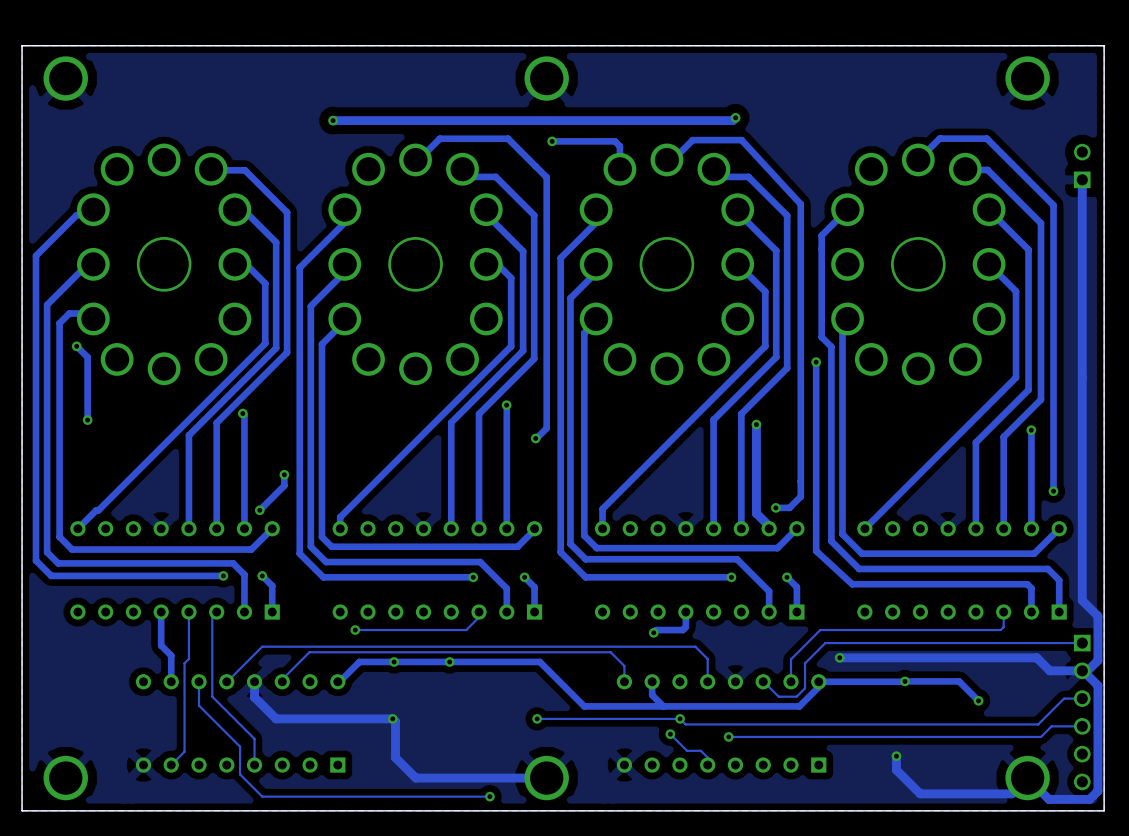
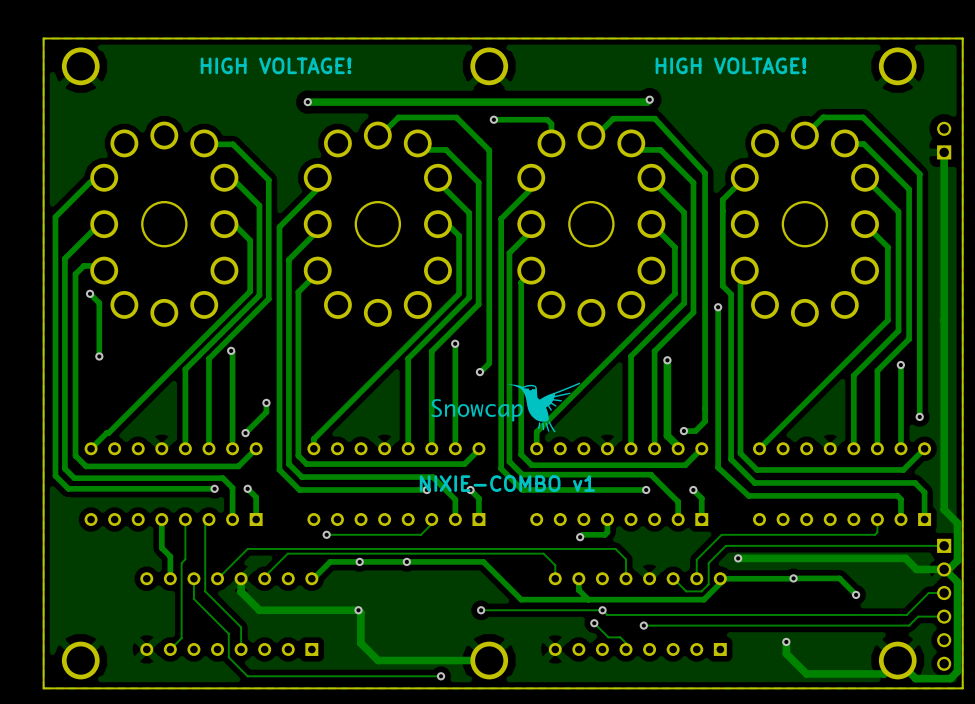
text: none -> HIGH VOLTAGE! (276, 65)
text: none -> HIGH VOLTAGE! (730, 65)
drawing: none -> [431, 382, 581, 433]
text: none -> NIXIE-COMBO v1 (507, 483)

